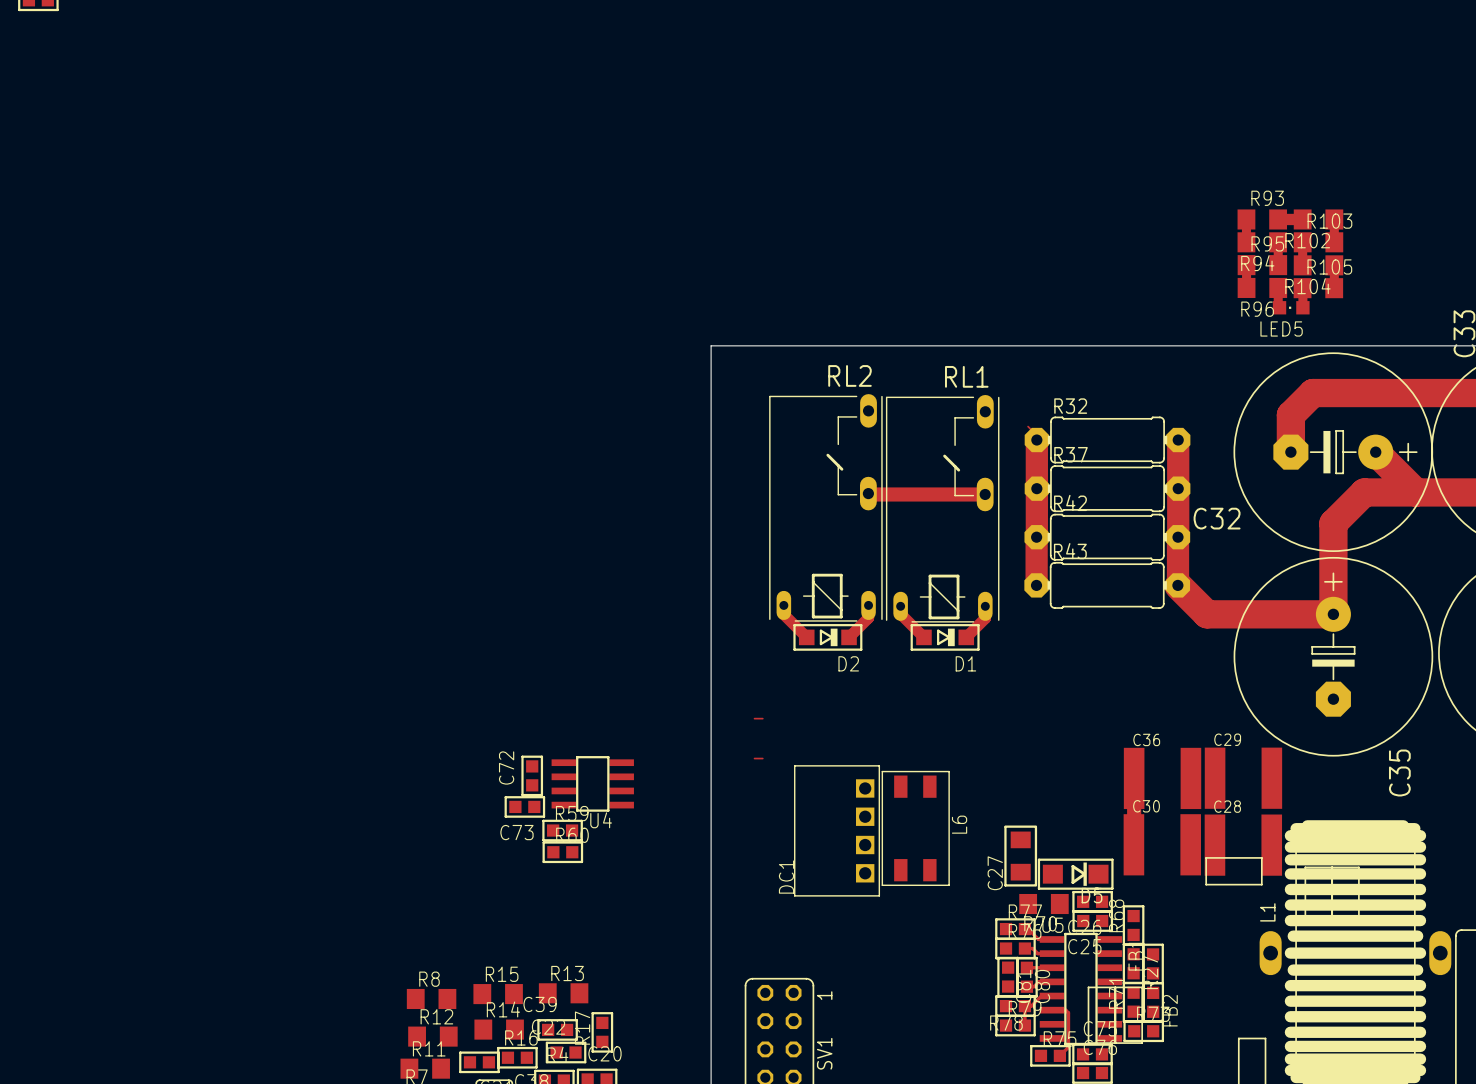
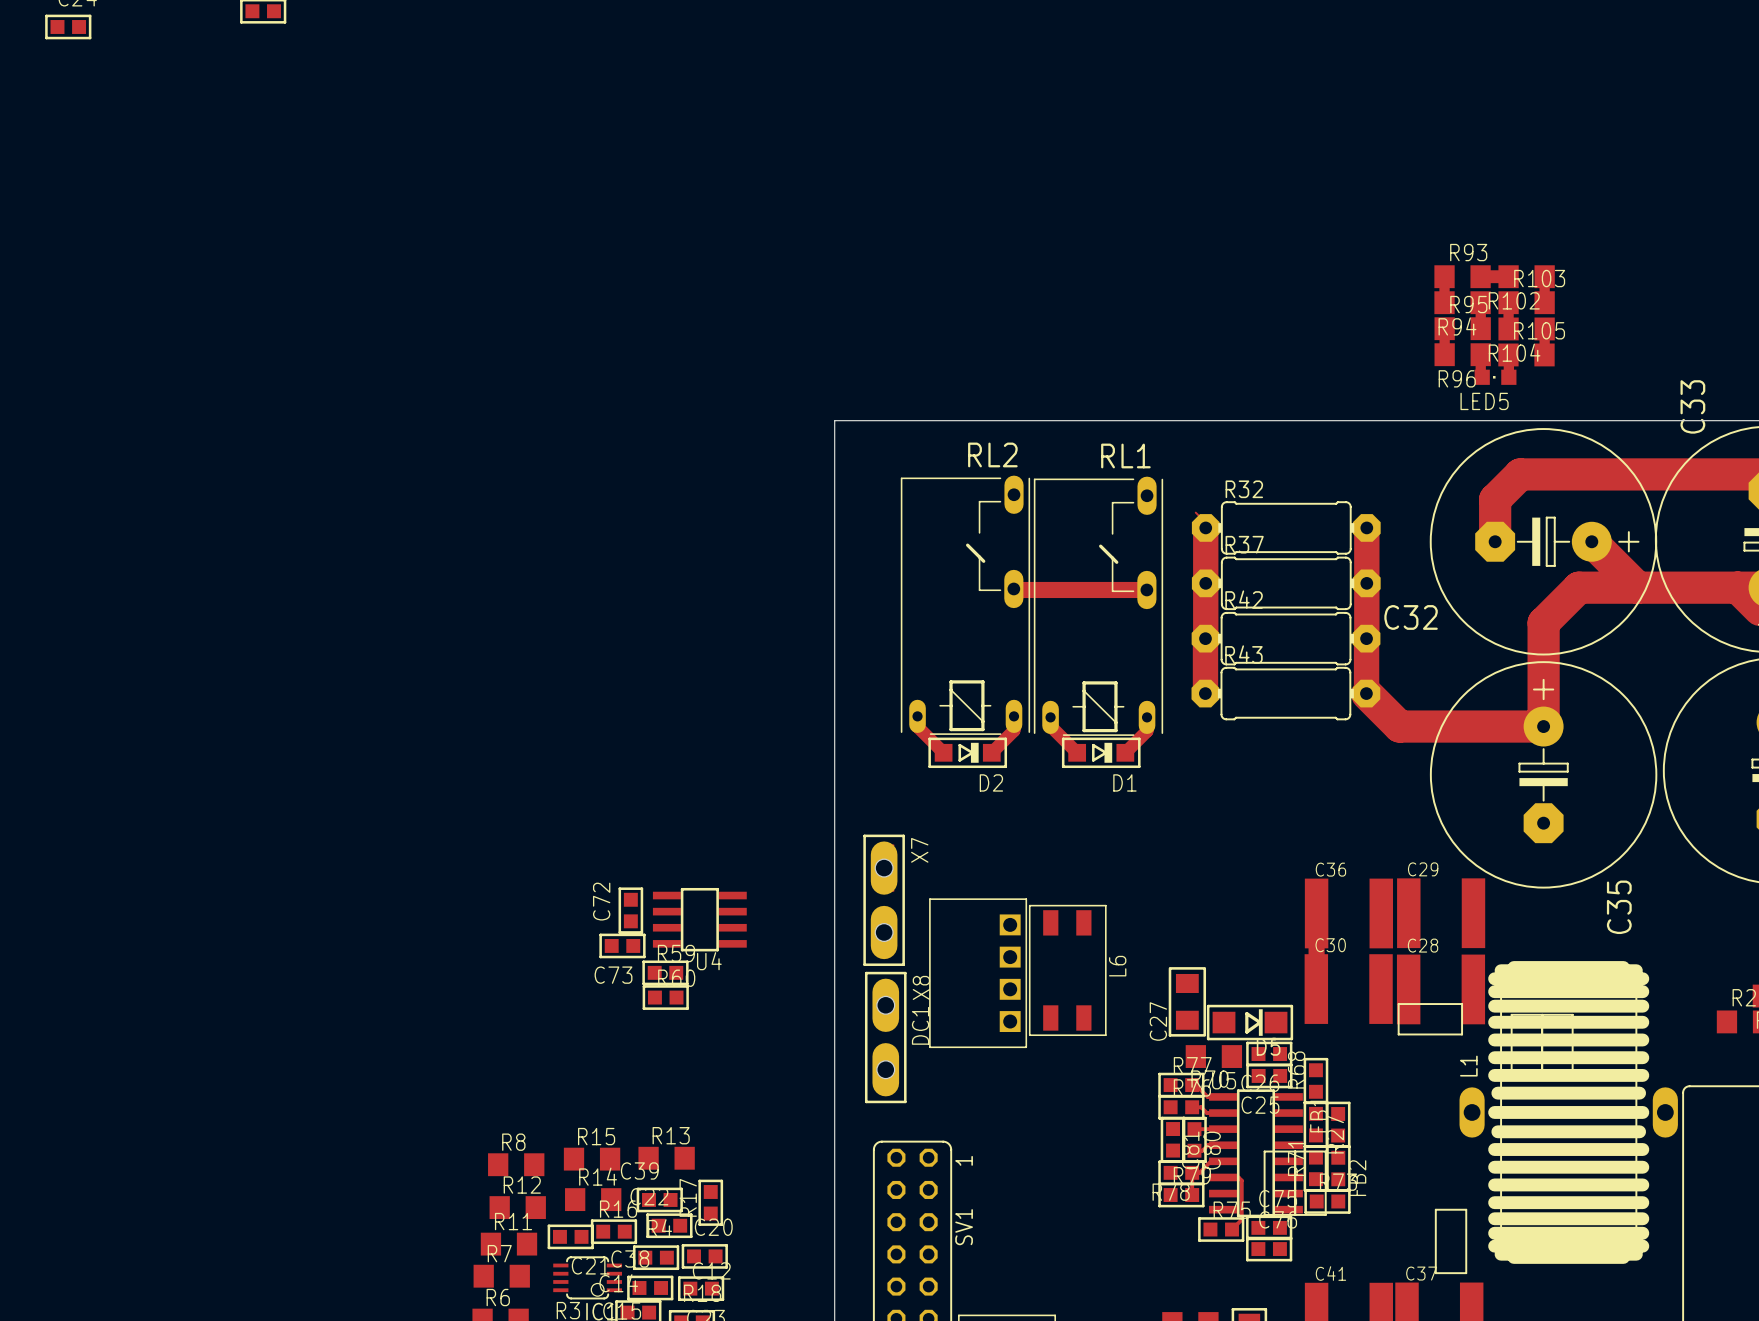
X7: none -> (884, 900)
X8: none -> (885, 1037)

